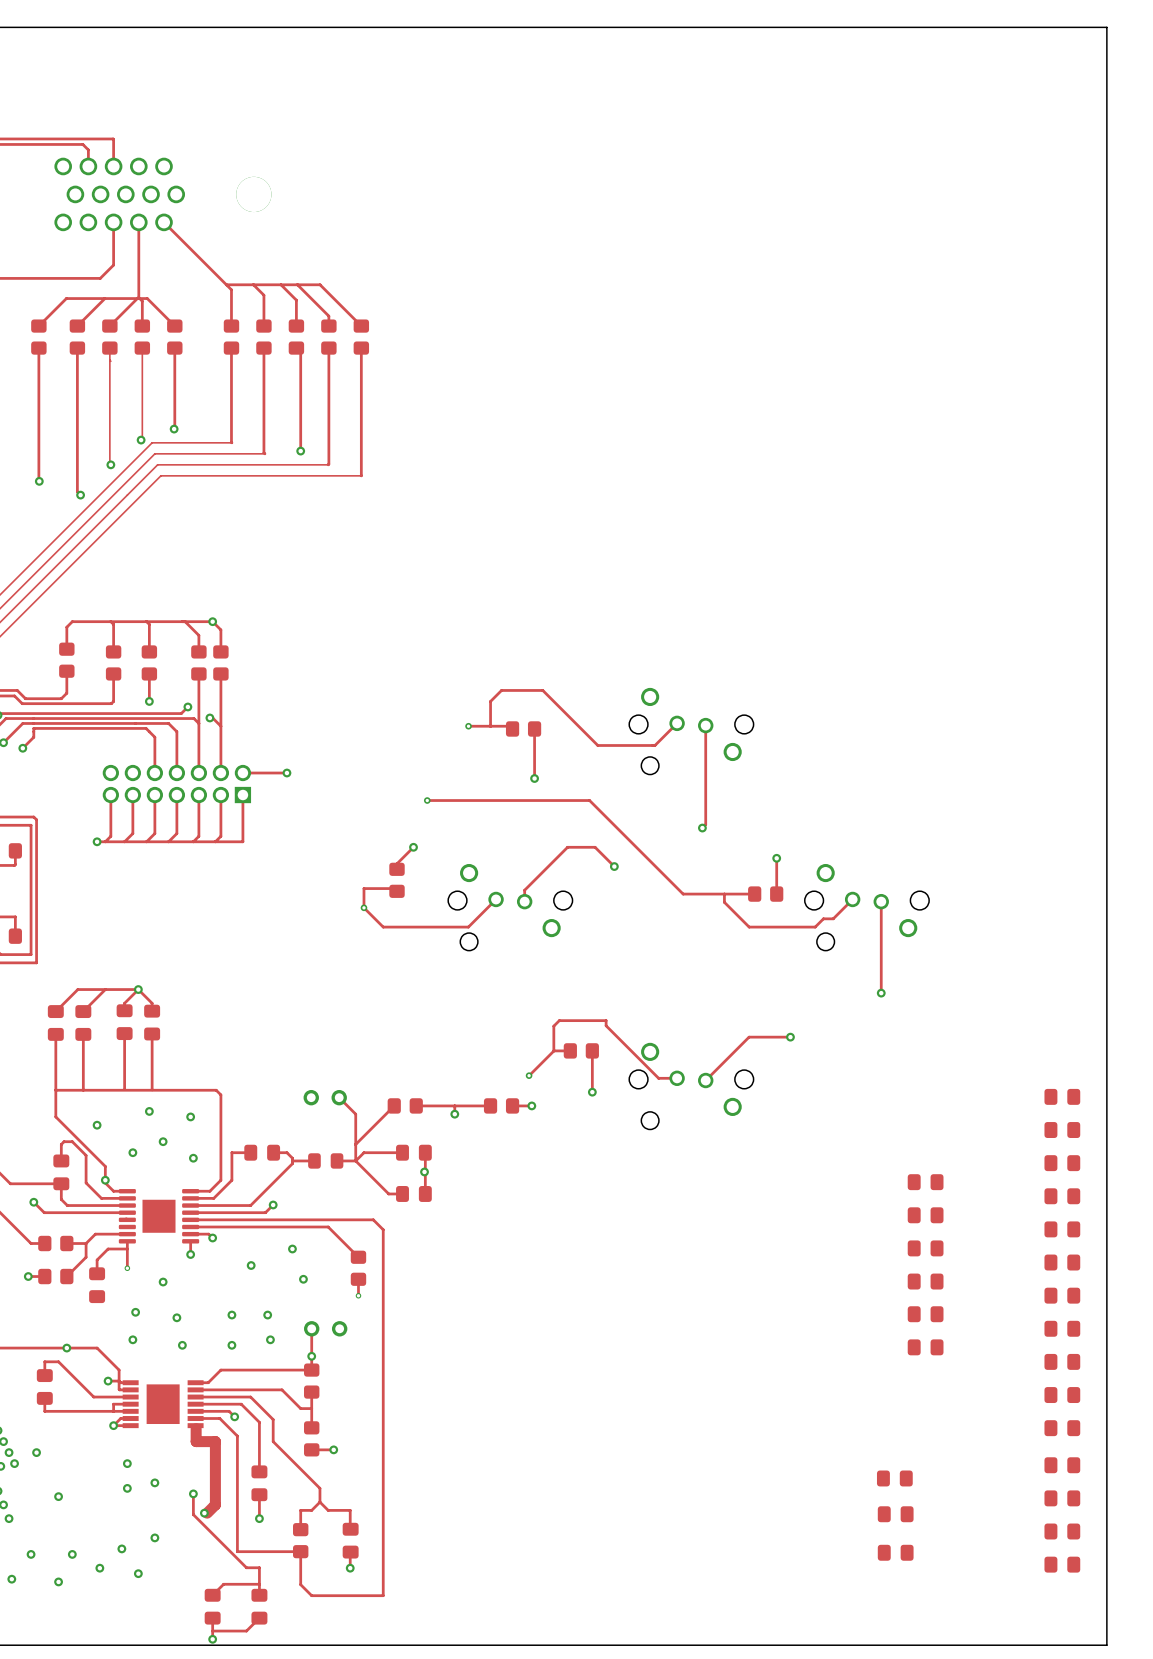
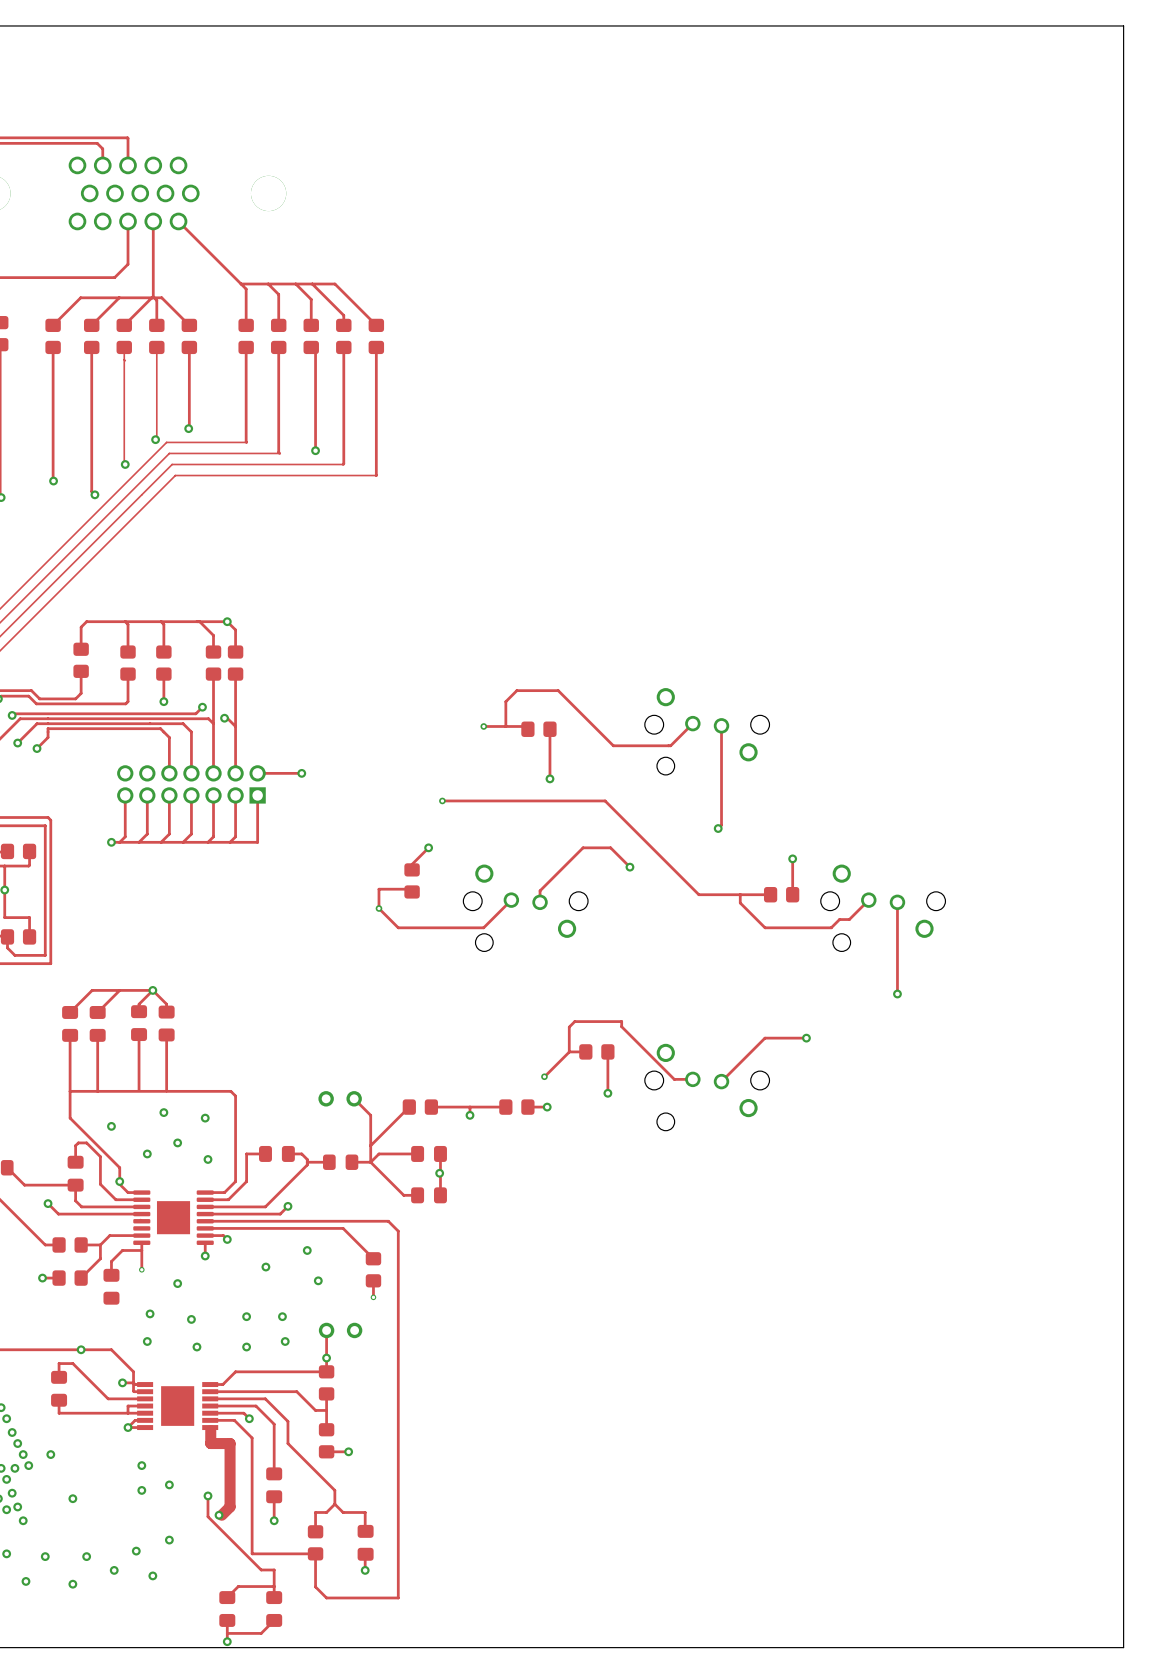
part: (1062, 1096) -> none
part: (1062, 1130) -> none
part: (1062, 1163) -> none
part: (925, 1182) -> none
part: (1062, 1196) -> none
part: (925, 1215) -> none
part: (1062, 1229) -> none
part: (925, 1248) -> none
part: (1062, 1262) -> none
part: (925, 1281) -> none
part: (1062, 1295) -> none
part: (925, 1314) -> none
part: (1062, 1328) -> none
part: (925, 1347) -> none
part: (1062, 1361) -> none
part: (1062, 1395) -> none
part: (1062, 1428) -> none
part: (1062, 1465) -> none
part: (894, 1478) -> none
part: (1062, 1498) -> none
part: (895, 1514) -> none
part: (1062, 1531) -> none
part: (895, 1552) -> none
part: (1062, 1564) -> none

